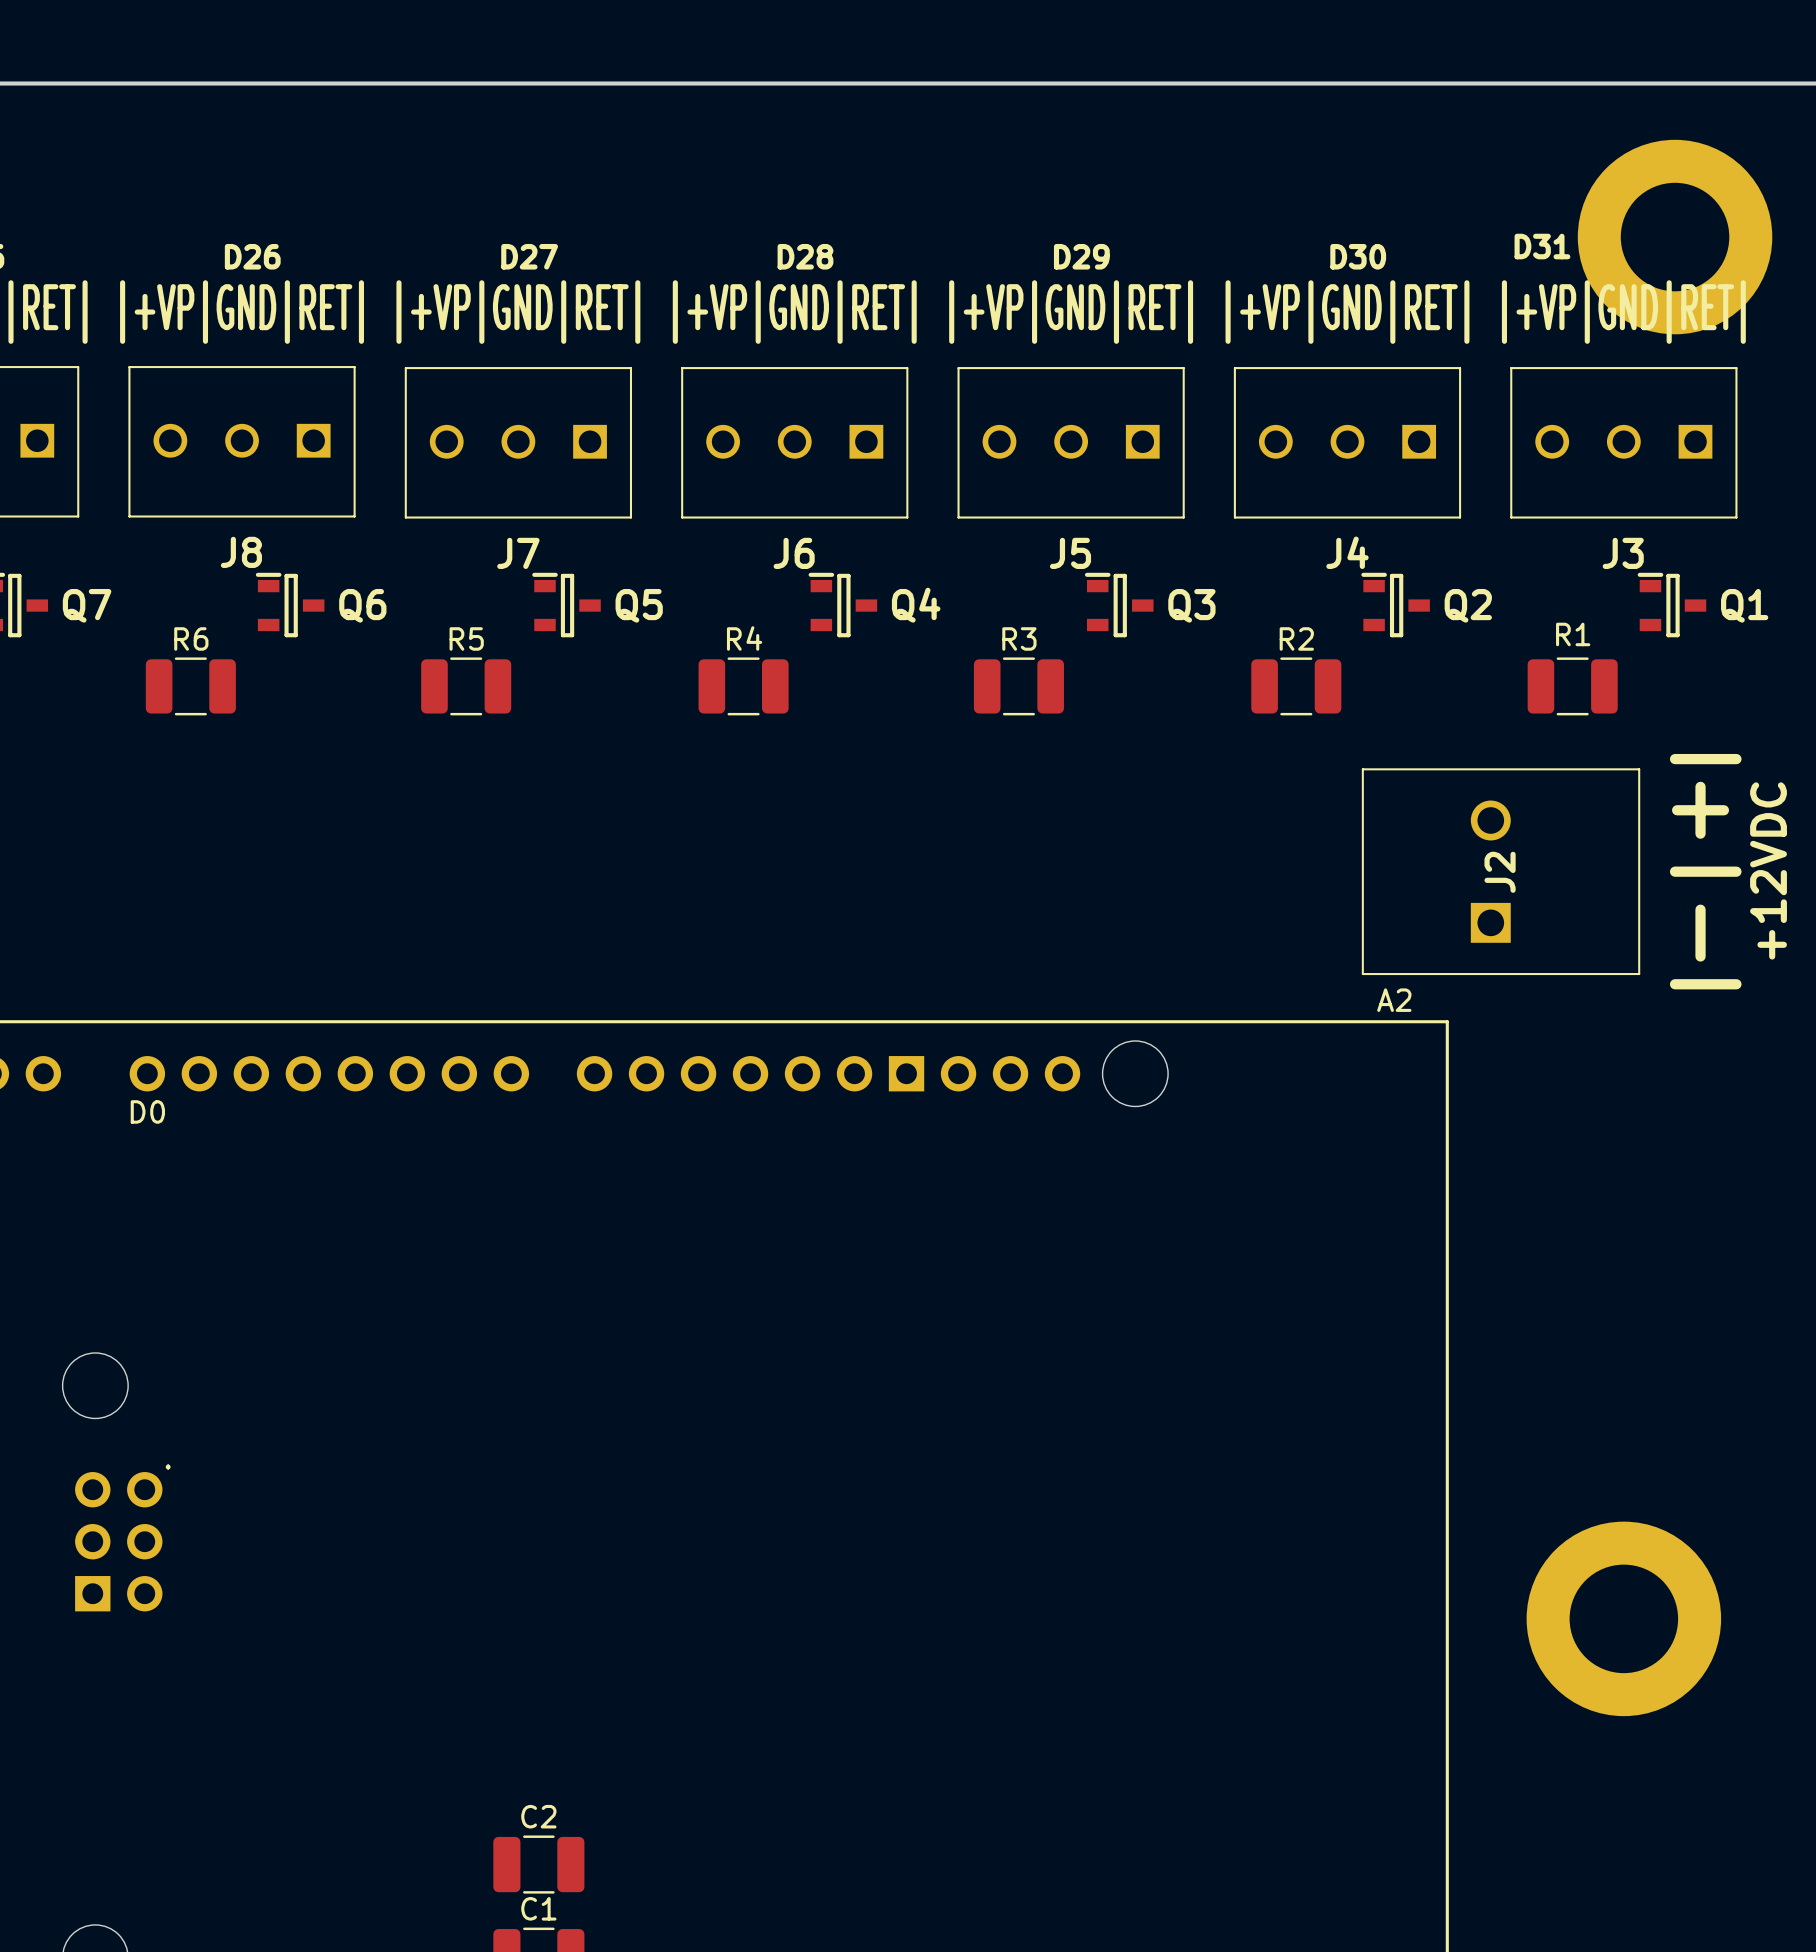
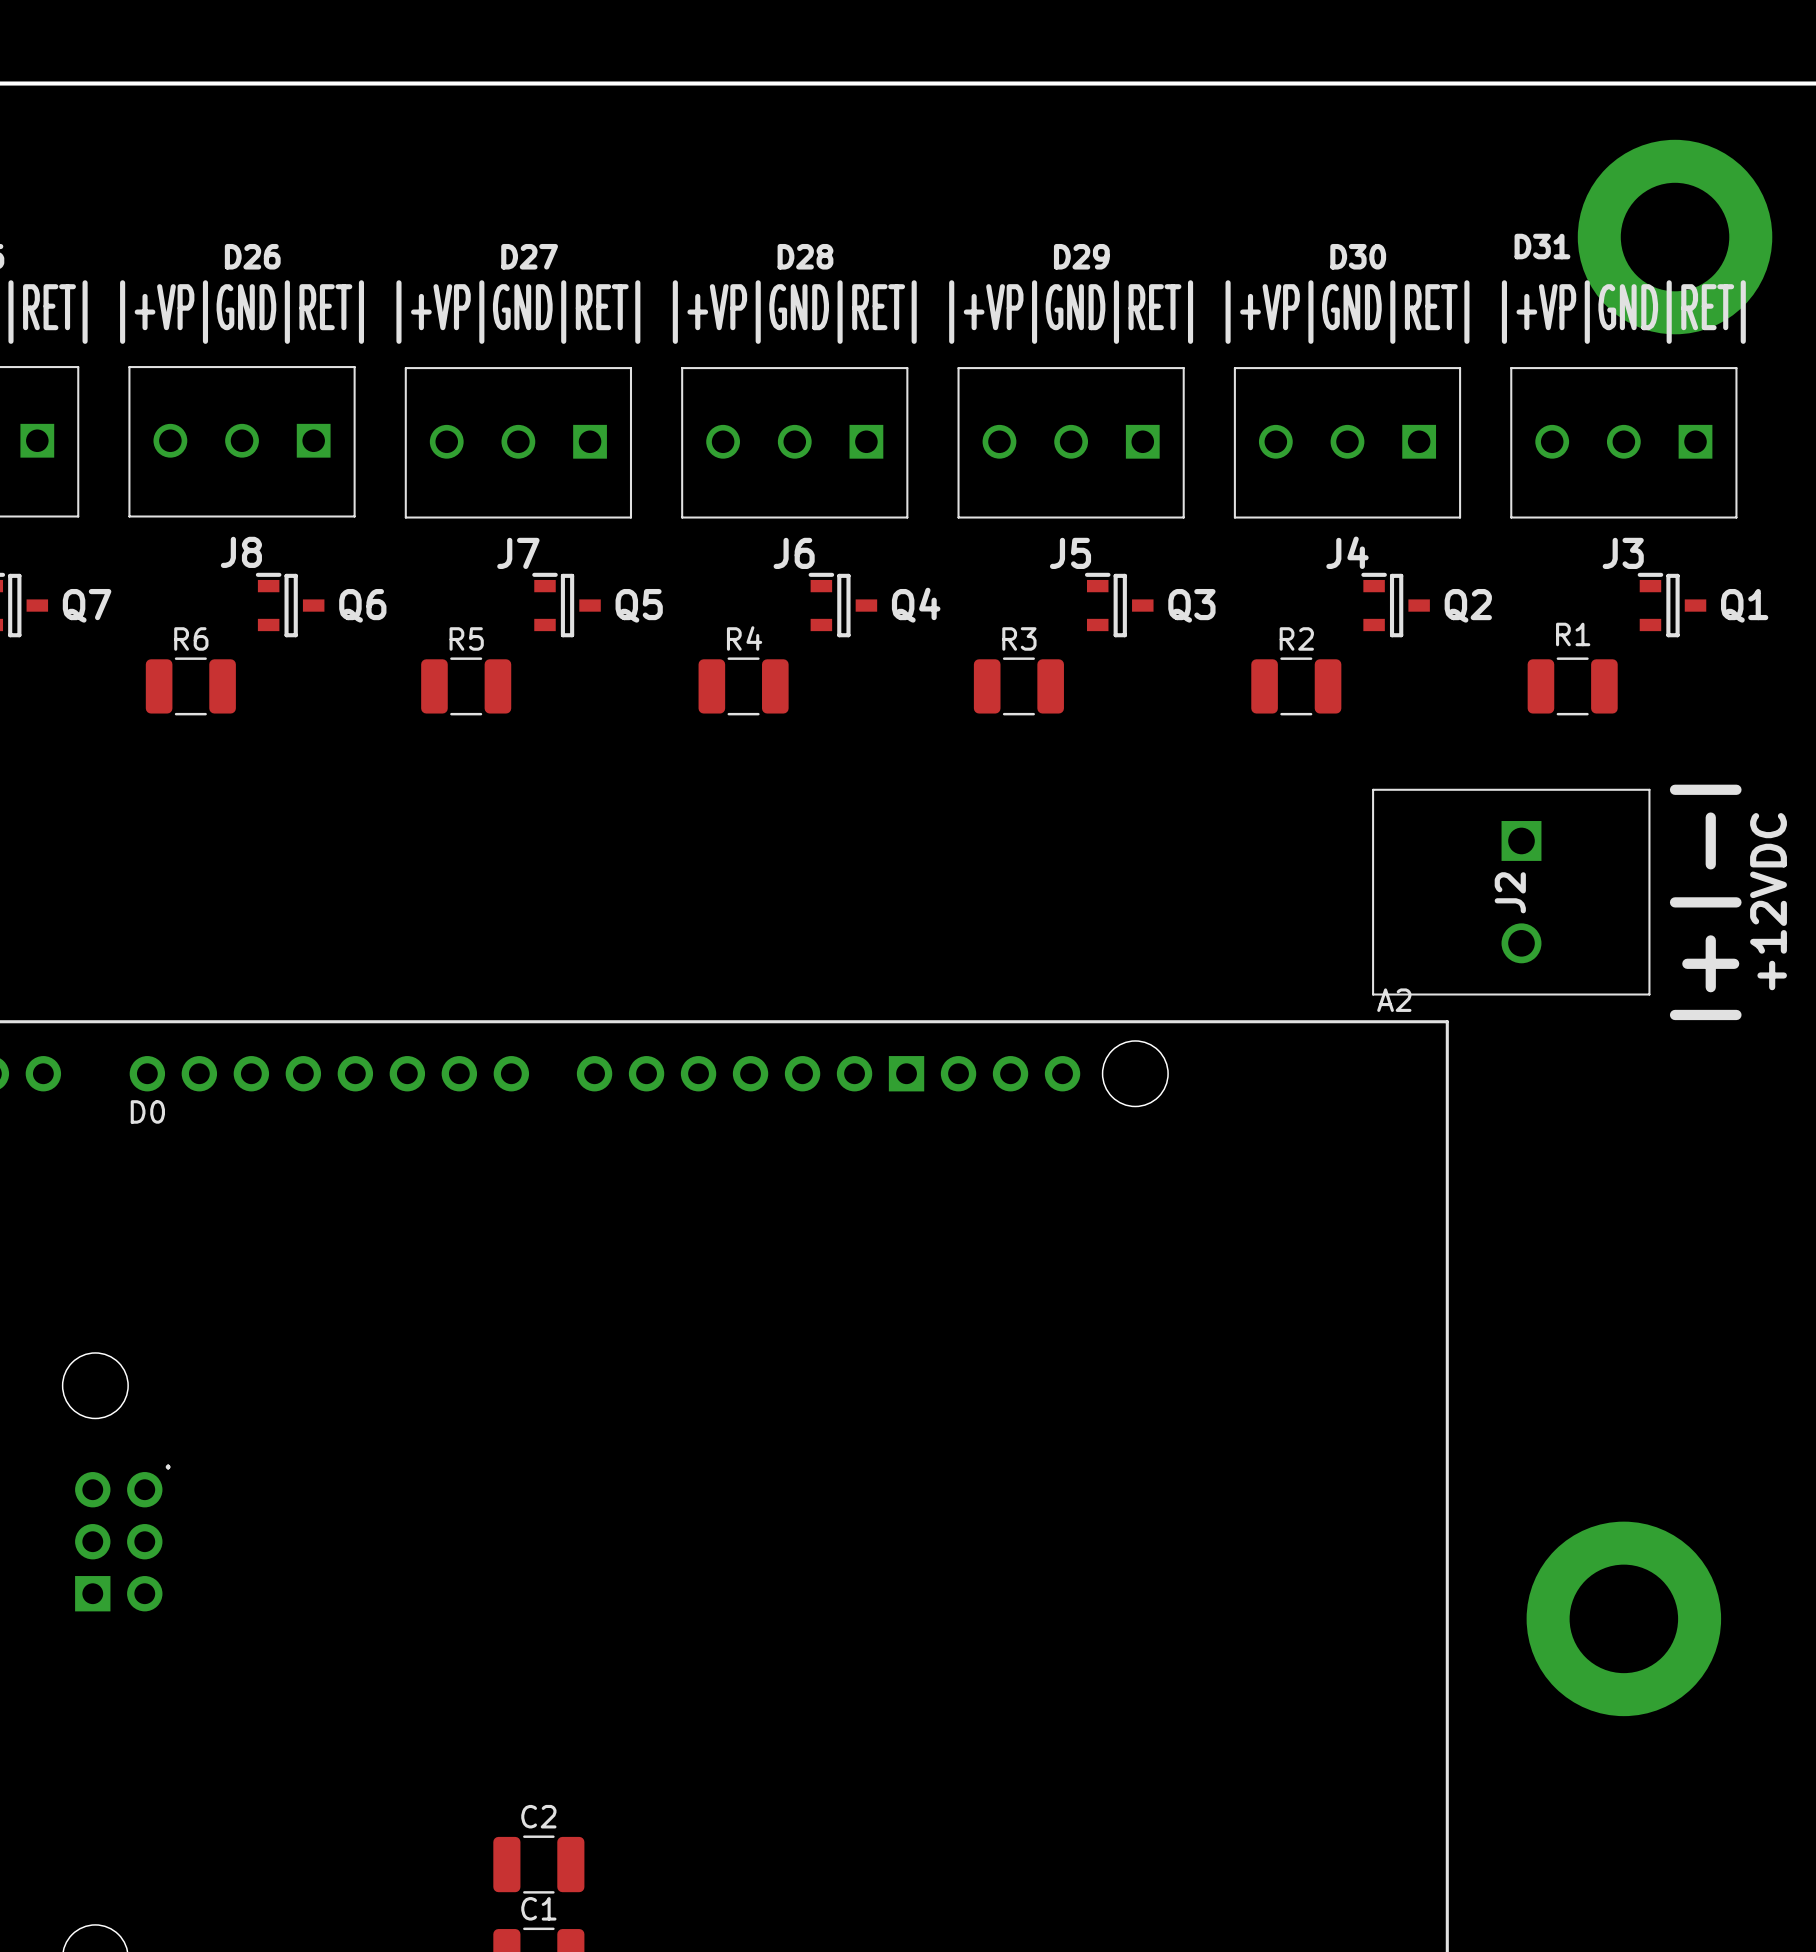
line: (1675, 759) (1736, 759) -> (1675, 789) (1736, 789)
text position: + (1700, 810) -> + (1710, 963)
text position: +12VDC (1768, 870) -> +12VDC (1768, 901)
J2 rotation: 0° (1501, 871) -> 180° (1511, 892)
line: (1675, 871) (1736, 871) -> (1675, 902) (1736, 902)
text position: - (1700, 933) -> - (1710, 840)
line: (1675, 984) (1736, 984) -> (1675, 1014) (1736, 1014)

